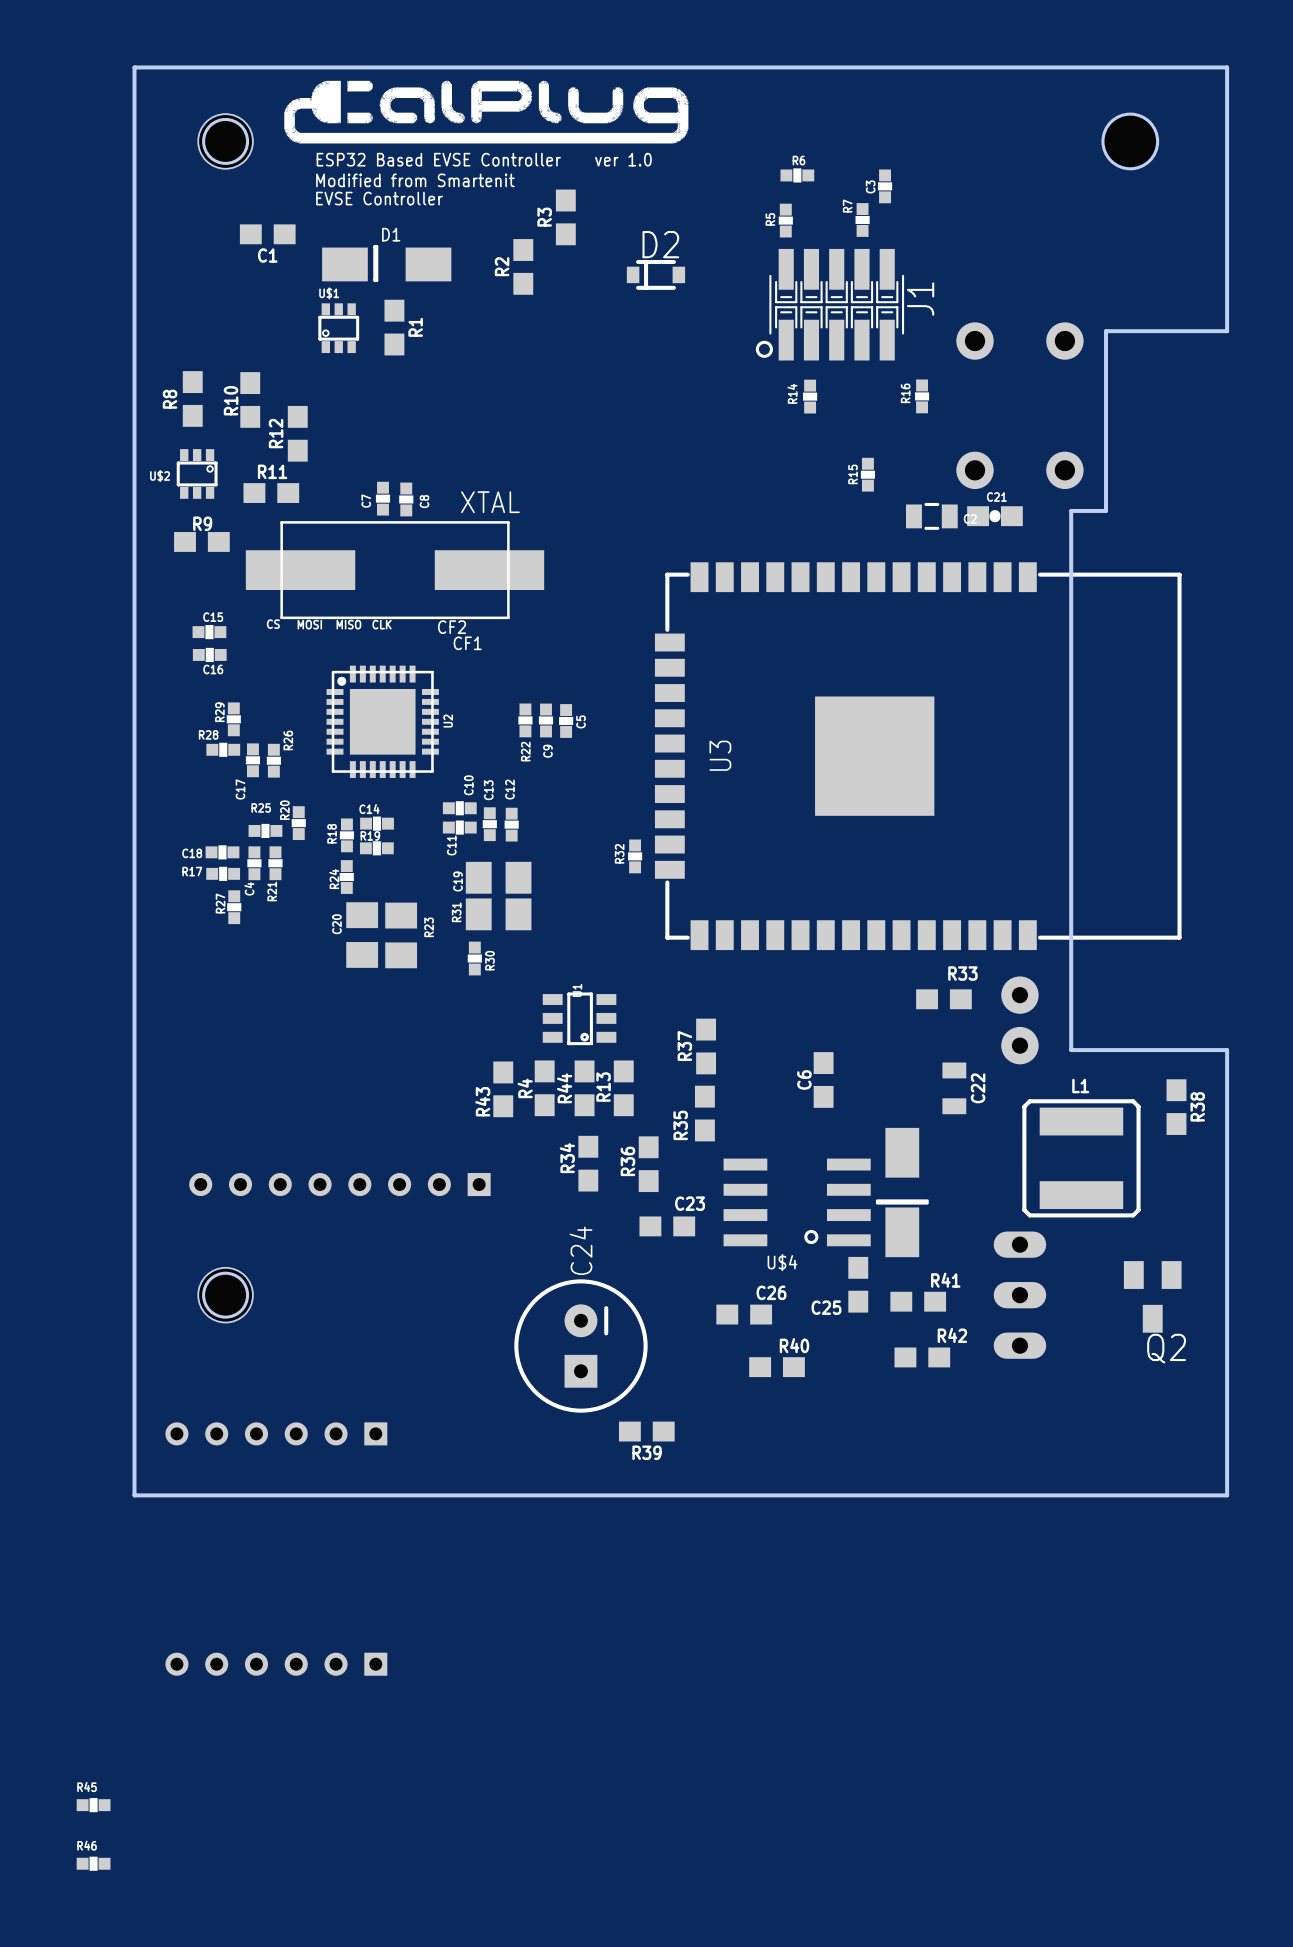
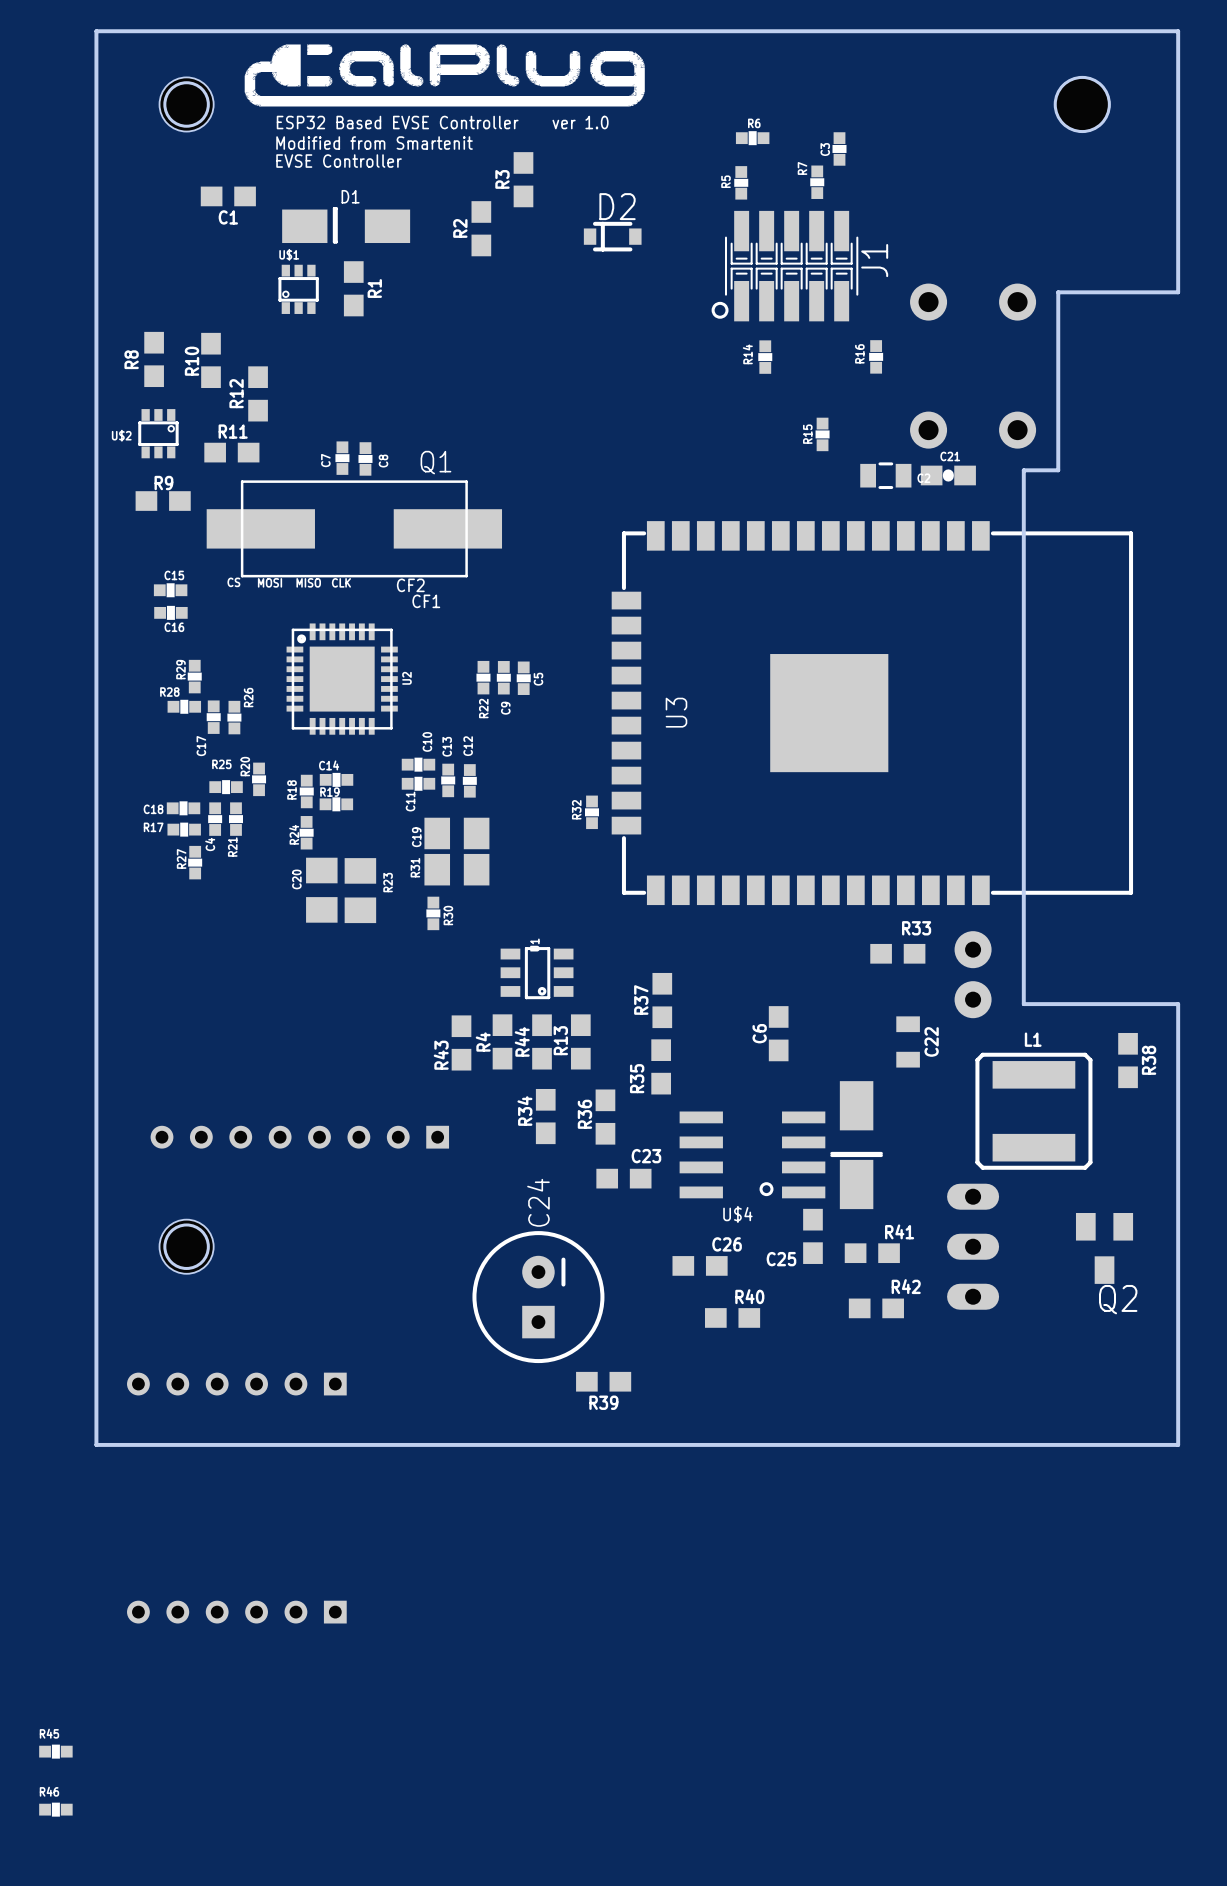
XTAL name: XTAL (490, 502) -> Q1 (435, 462)

